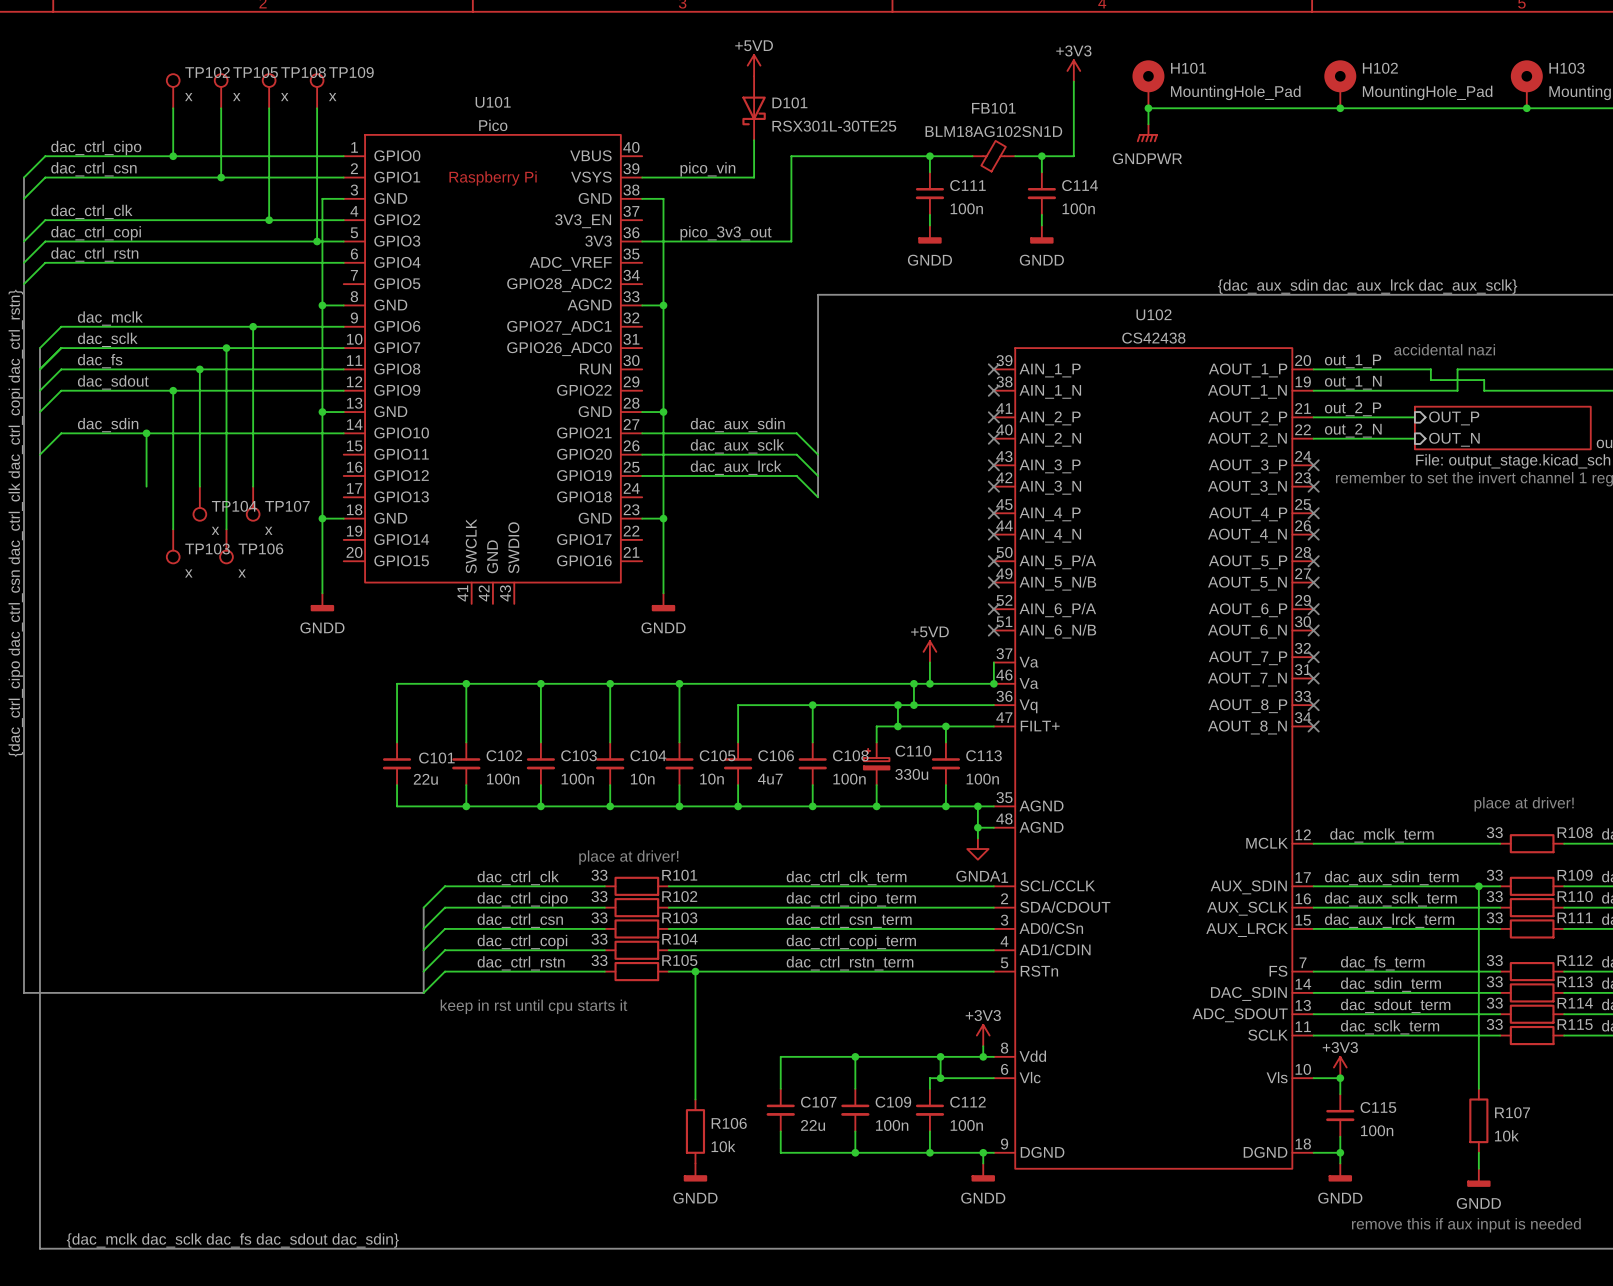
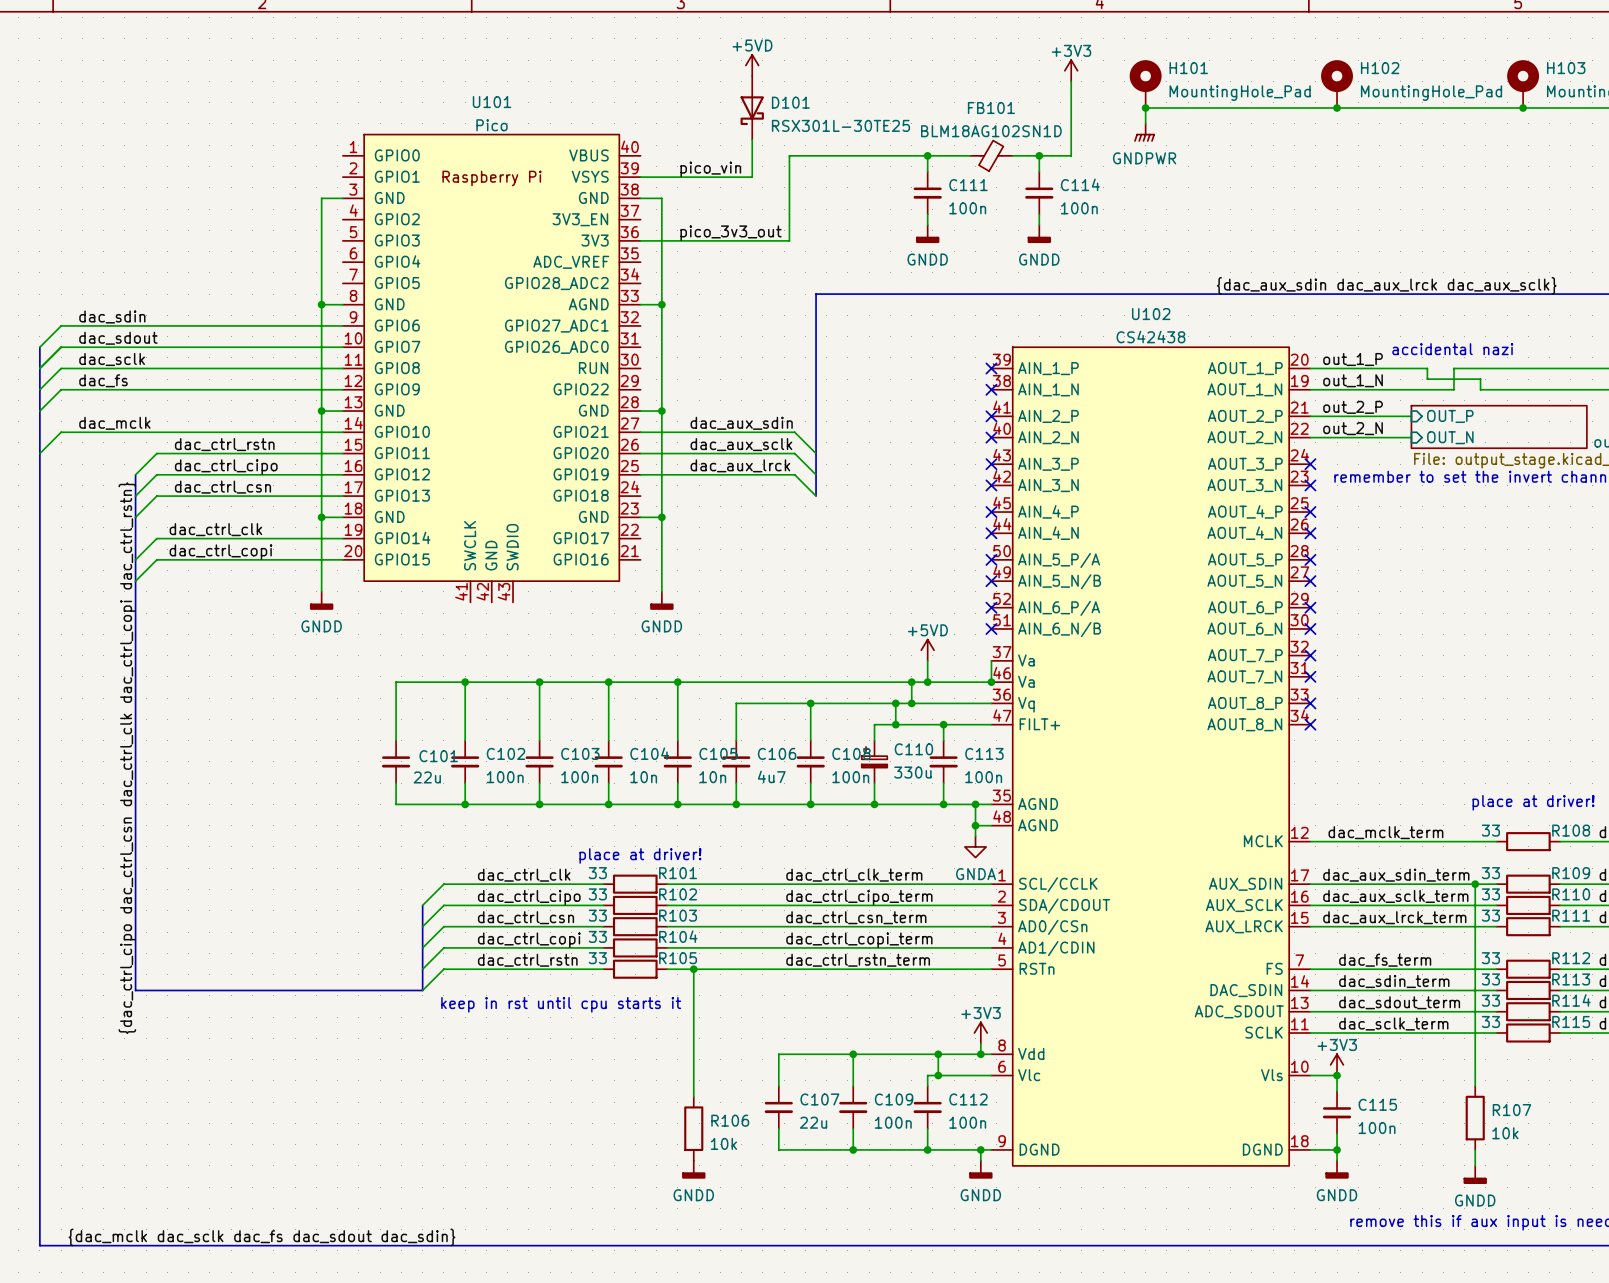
TP102: x (173, 91) -> none
TP105: x (221, 91) -> none
TP108: x (269, 91) -> none
TP109: x (317, 91) -> none
wire: (173, 108) (173, 156) -> none
wire: (221, 108) (221, 177) -> none
wire: (269, 108) (269, 220) -> none
wire: (317, 108) (317, 241) -> none
label: dac_ctrl_cipo (96, 148) -> none
junction: (173, 156) -> none
wire: (343, 156) (45, 156) (23, 177) -> none
label: dac_ctrl_csn (93, 169) -> none
bus: (23, 177) (23, 992) (135, 992) -> (135, 474) (135, 990)
junction: (221, 177) -> none
wire: (343, 177) (45, 177) (23, 198) -> none
label: dac_ctrl_clk (91, 211) -> none
junction: (269, 220) -> none
wire: (343, 220) (45, 220) (23, 241) -> none
label: dac_ctrl_copi (96, 233) -> none
junction: (317, 241) -> none
wire: (343, 241) (45, 241) (23, 262) -> none
label: dac_ctrl_rstn (94, 254) -> none
wire: (343, 262) (45, 262) (23, 284) -> none
label: dac_mclk (110, 318) -> dac_sdin (112, 316)
wire: (253, 326) (253, 486) -> none
junction: (253, 326) -> none
label: dac_sclk (107, 339) -> dac_sdout (118, 338)
wire: (226, 348) (226, 529) -> none
junction: (226, 348) -> none
label: dac_fs (100, 361) -> dac_sclk (112, 359)
wire: (199, 369) (199, 486) -> none
junction: (199, 369) -> none
label: dac_sdout (113, 382) -> dac_fs (103, 380)
wire: (173, 390) (173, 529) -> none
junction: (173, 390) -> none
label: dac_sdin (108, 425) -> dac_mclk (114, 423)
wire: (146, 433) (146, 486) -> none
junction: (146, 433) -> none
label: none -> dac_ctrl_rstn (224, 444)
wire: none -> (342, 453) (156, 453) (135, 474)
label: none -> dac_ctrl_cipo (226, 467)
wire: none -> (342, 474) (156, 474) (135, 496)
label: none -> dac_ctrl_csn (222, 487)
wire: none -> (342, 496) (156, 496) (135, 517)
TP104: x (199, 503) -> none
TP107: x (253, 503) -> none
label: {dac_ctrl_cipo dac_ctrl_csn dac_ctrl_clk dac_ctrl_copi dac_ctrl_rstn} (15, 523) -> none
label: none -> dac_ctrl_clk (215, 529)
wire: none -> (342, 538) (156, 538) (135, 559)
TP103: x (173, 546) -> none
TP106: x (226, 546) -> none
label: none -> dac_ctrl_copi (220, 552)
wire: none -> (342, 559) (156, 559) (135, 581)
label: none -> {dac_ctrl_cipo dac_ctrl_csn dac_ctrl_clk dac_ctrl_copi dac_ctrl_rstn} (127, 758)

